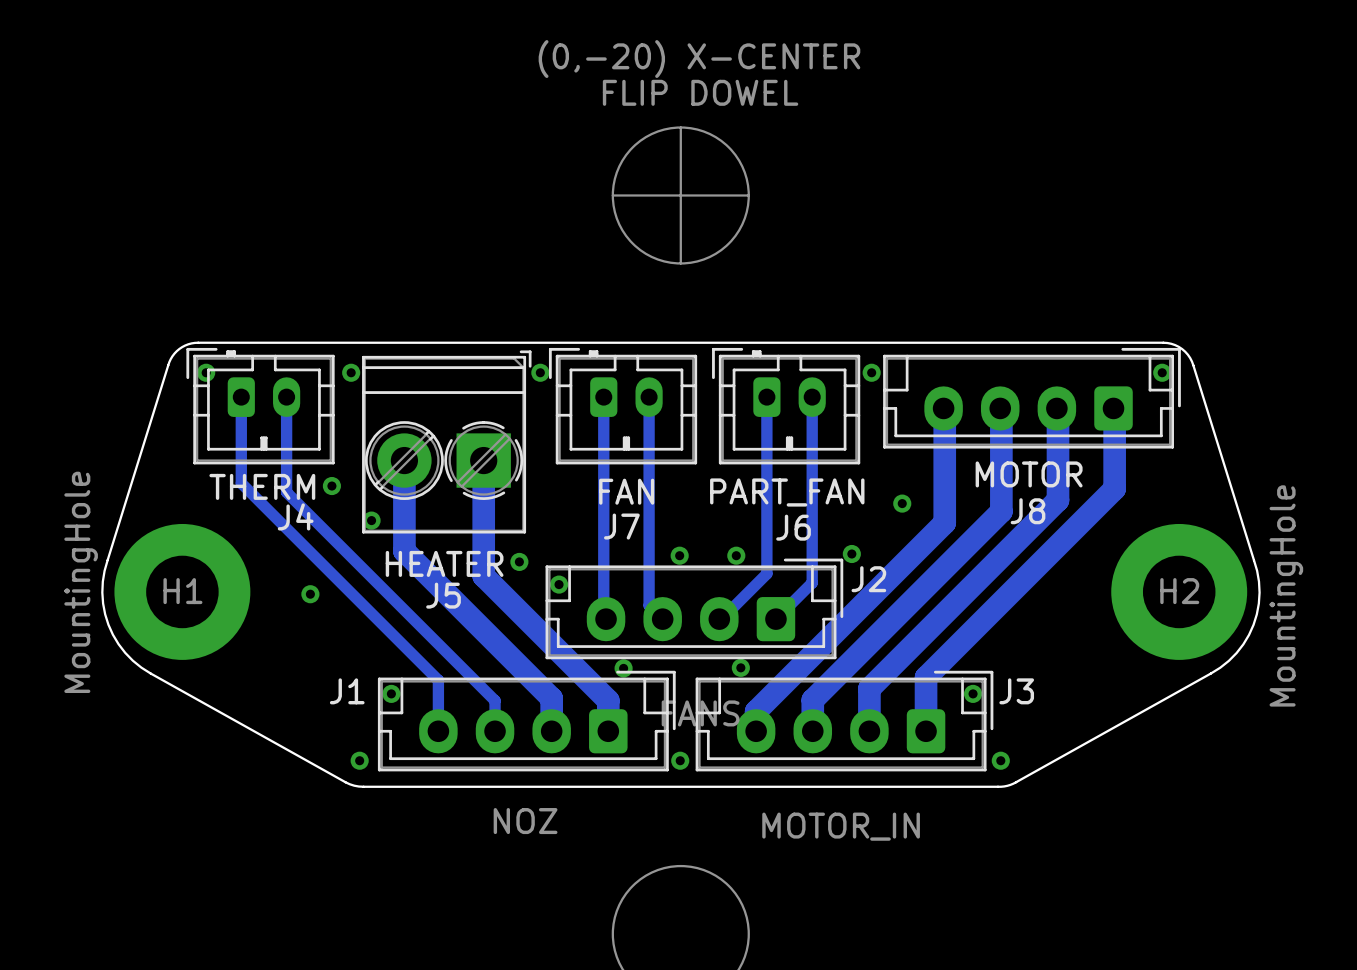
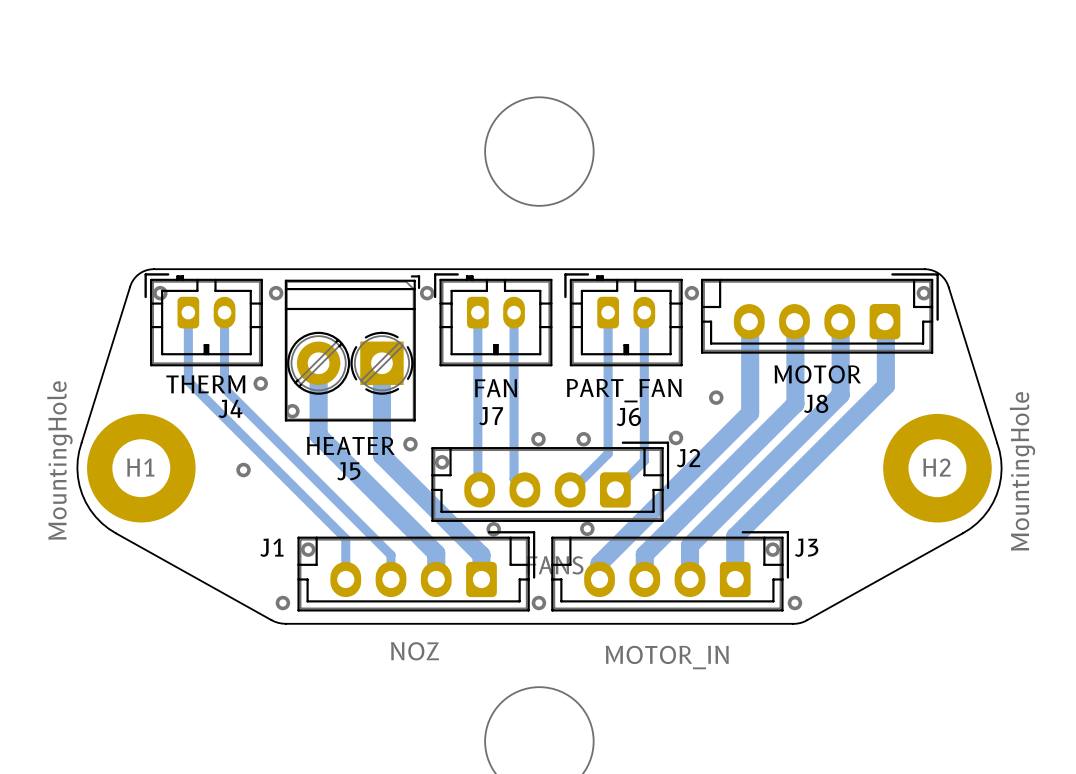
text: (0,-20) X-CENTER (699, 59) -> none
text: FLIP DOWEL (700, 92) -> none
line: (680, 127) (680, 263) -> none
line: (612, 195) (748, 195) -> none

